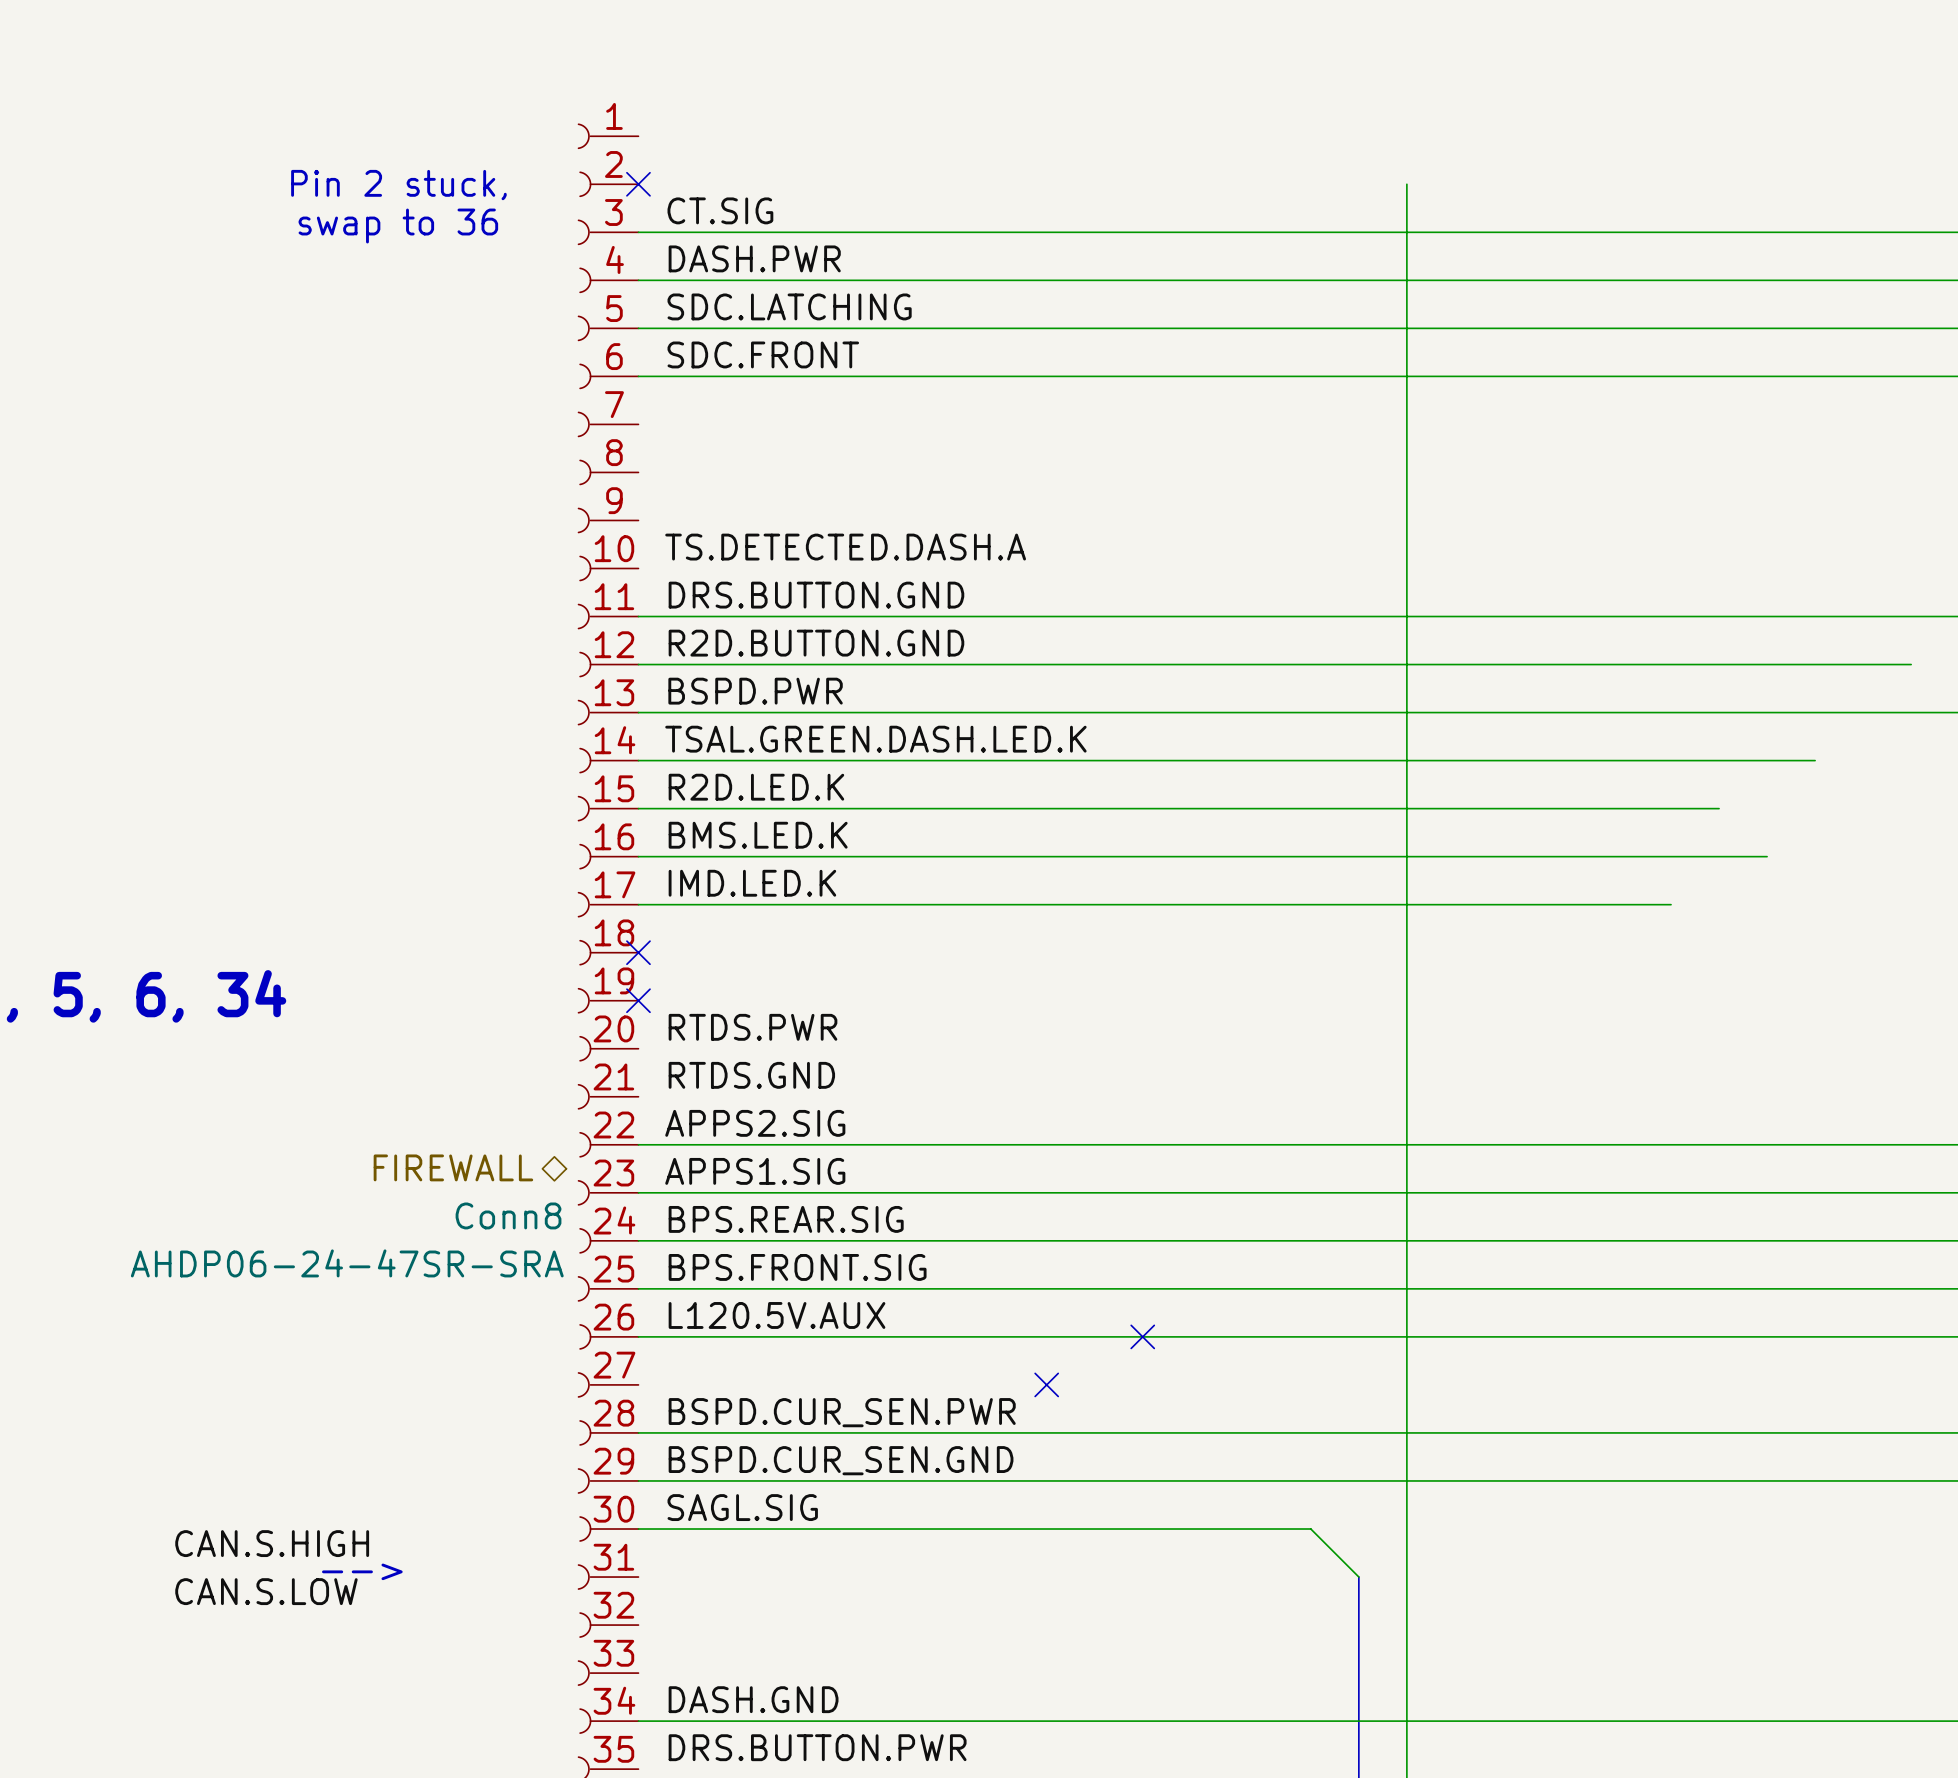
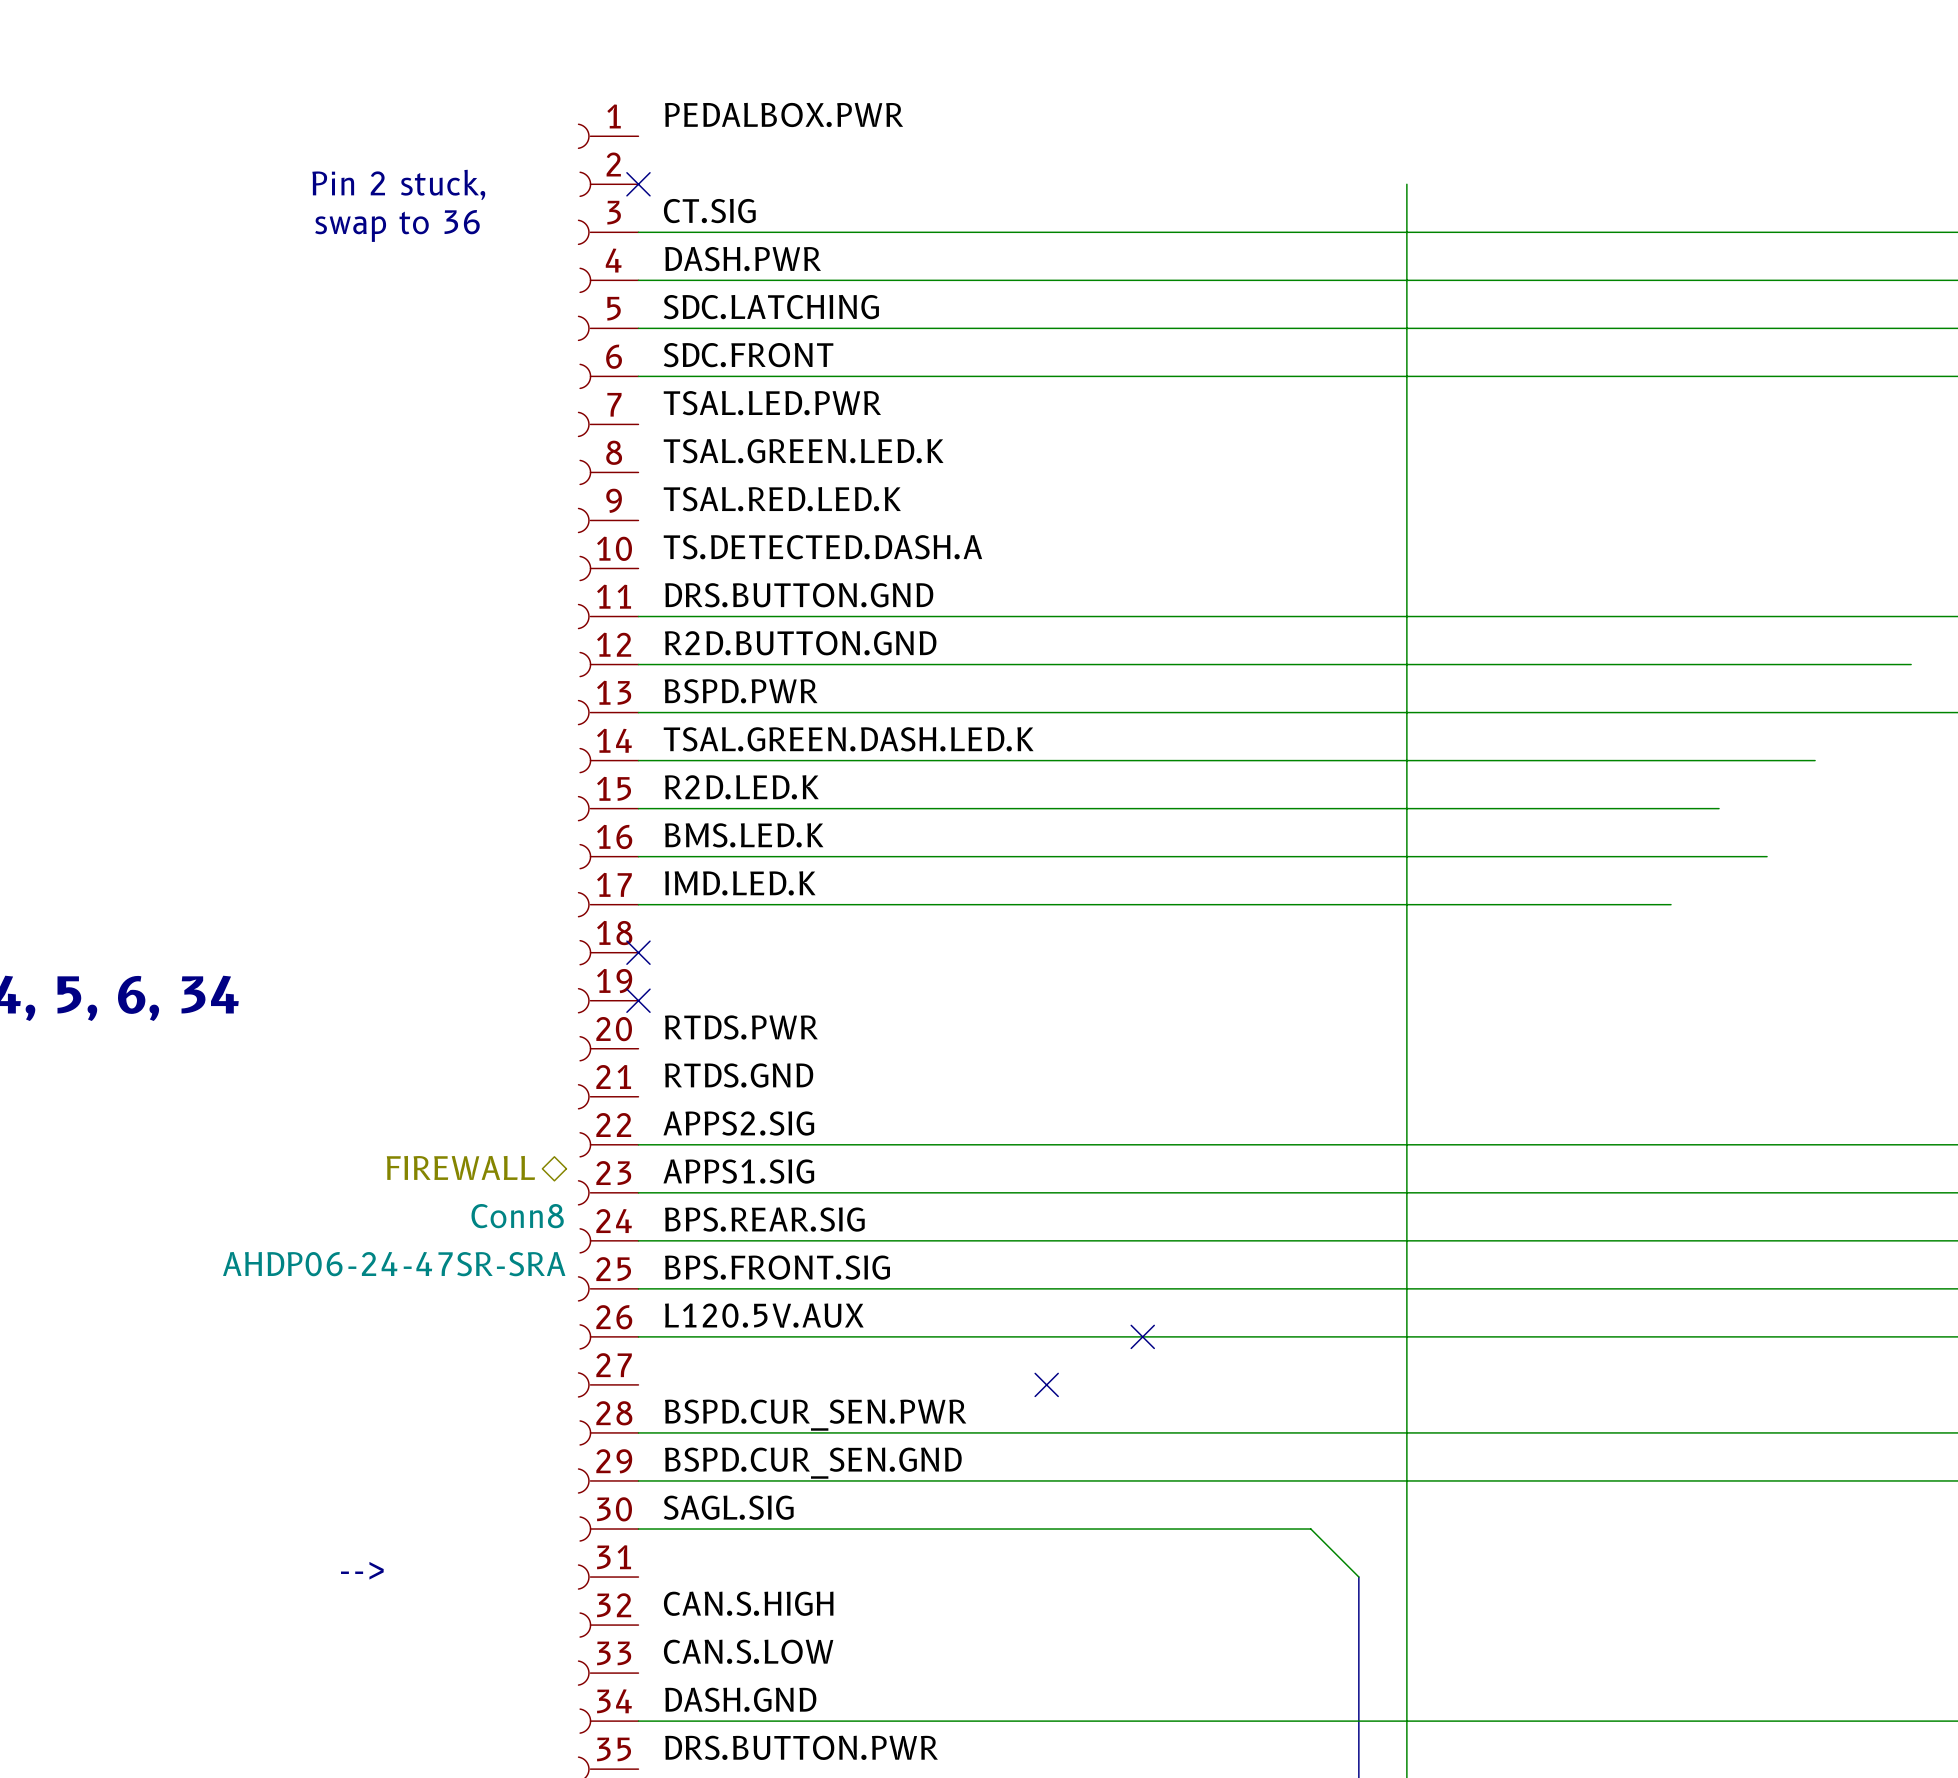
label: none -> PEDALBOX.PWR (784, 114)
label: none -> TSAL.LED.PWR (772, 403)
label: none -> TSAL.GREEN.LED.K (803, 451)
label: none -> TSAL.RED.LED.K (782, 499)
label: CAN.S.HIGH (272, 1543) -> none
label: CAN.S.LOW (266, 1591) -> none
label: none -> CAN.S.HIGH (748, 1603)
label: none -> CAN.S.LOW (748, 1651)

